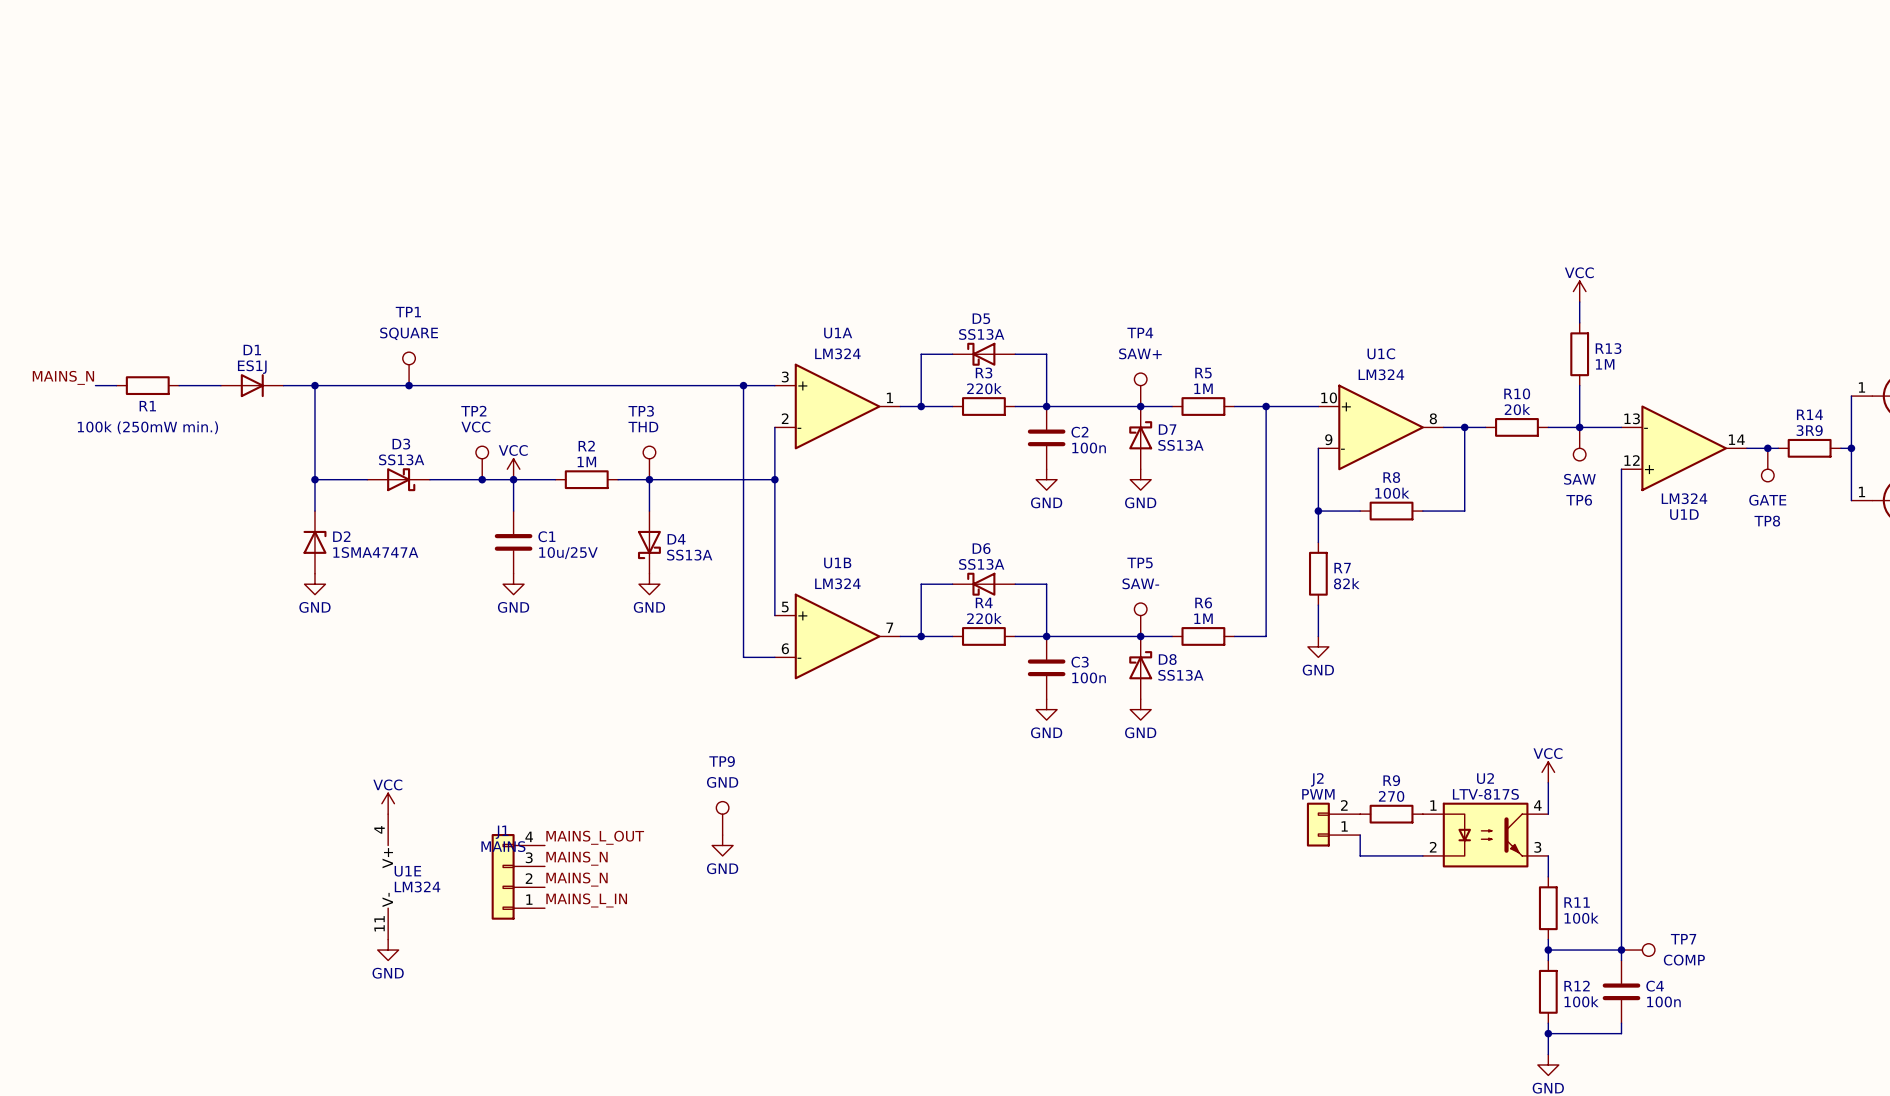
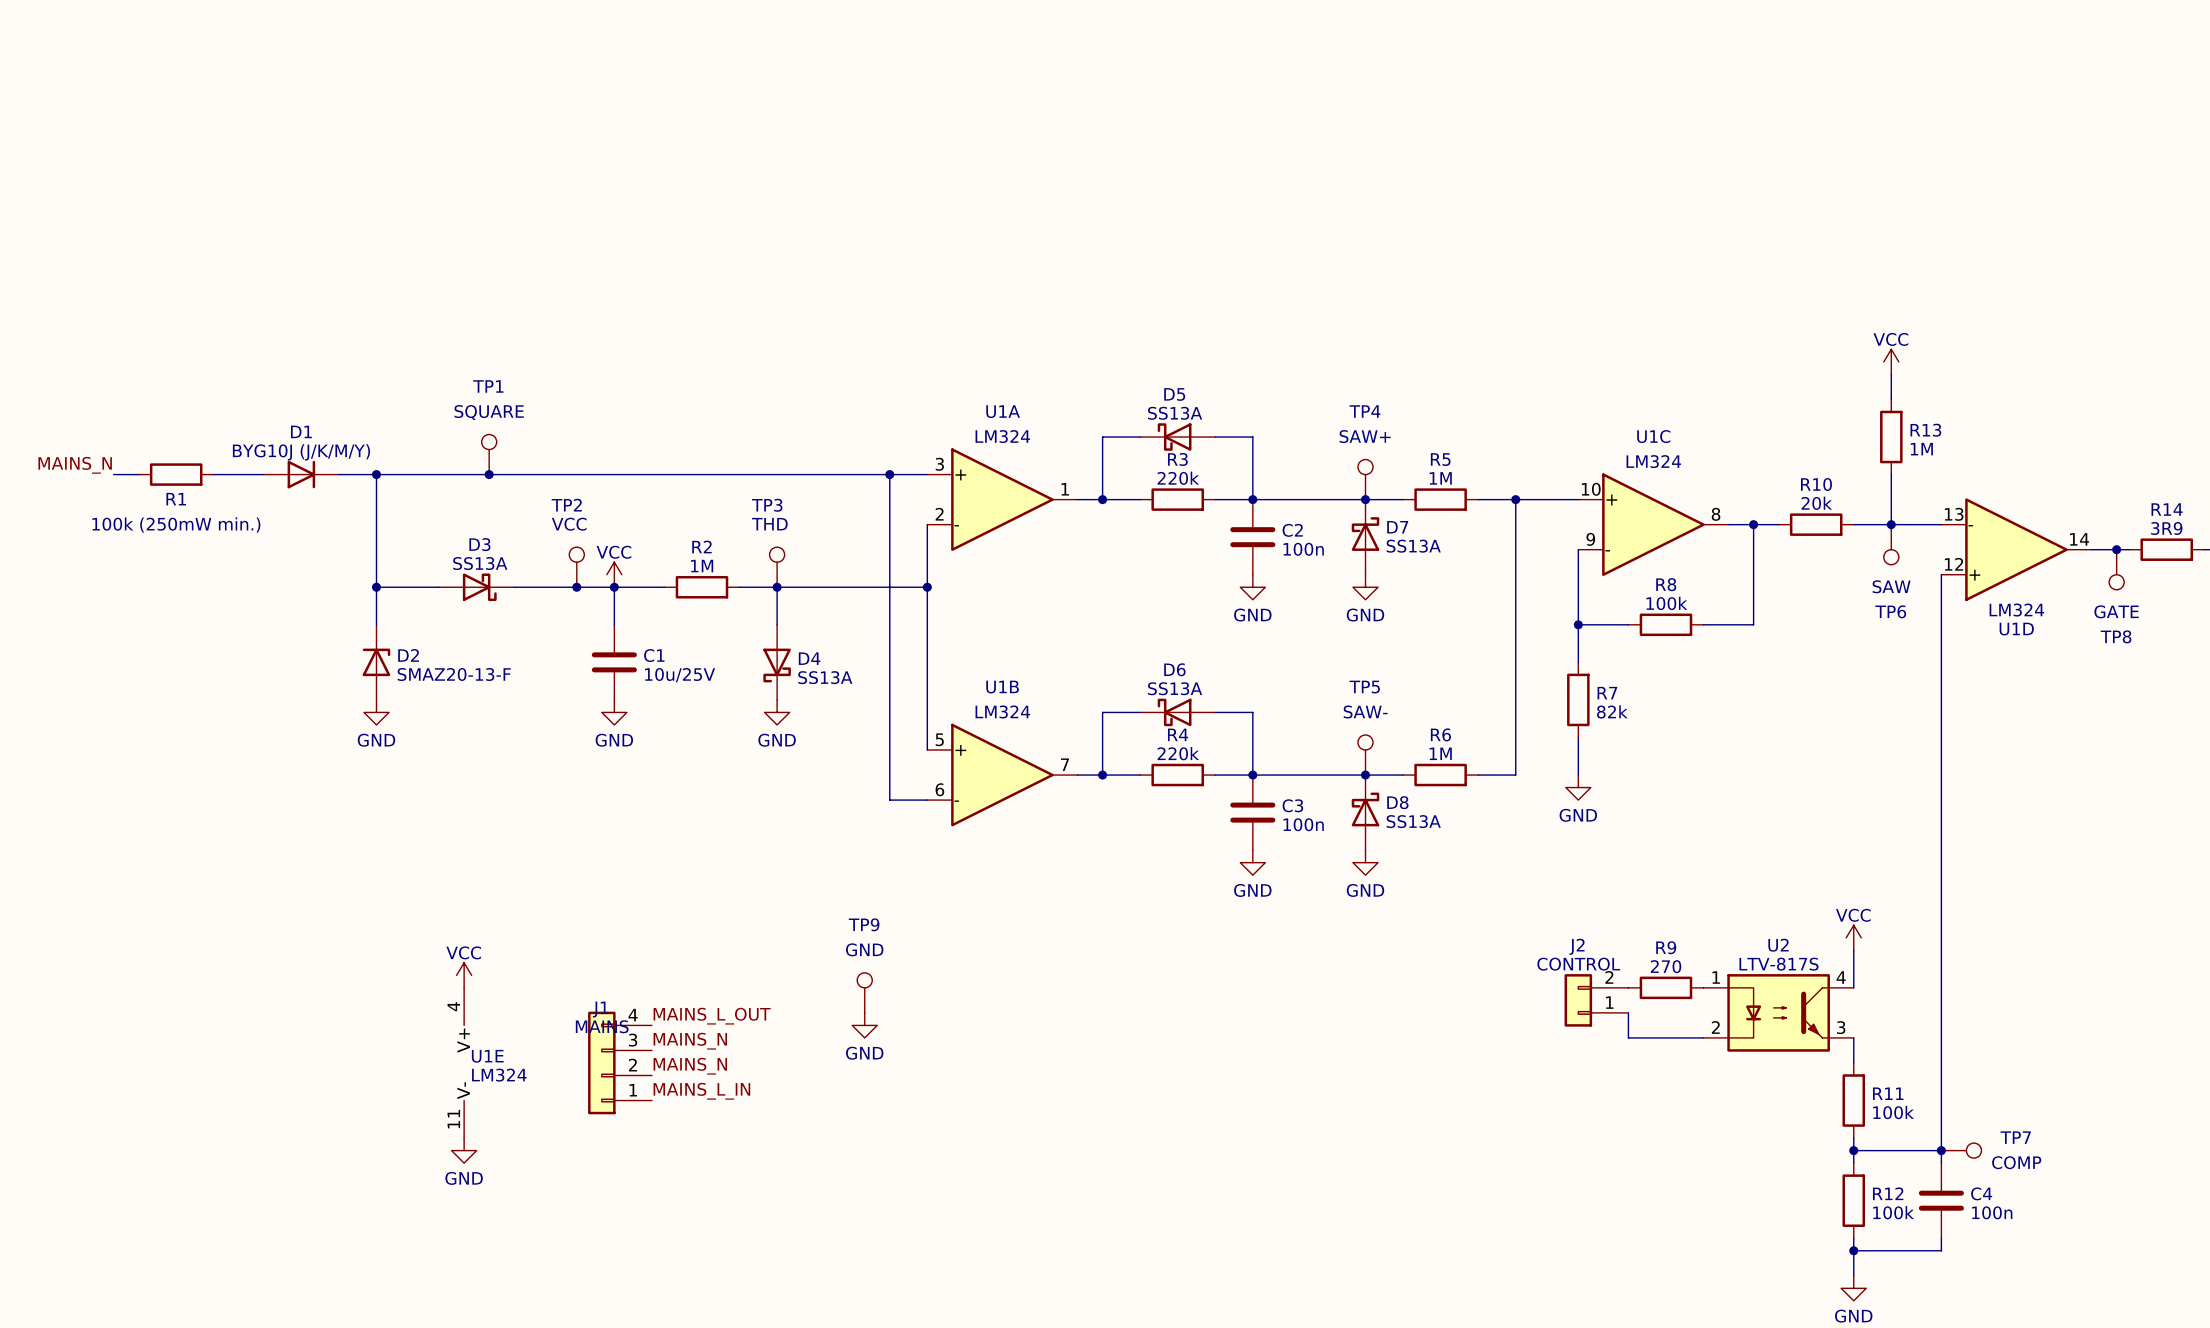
D1 value: ES1J (252, 367) -> BYG10J (J/K/M/Y) (301, 452)
D2 value: 1SMA4747A (375, 552) -> SMAZ20-13-F (454, 674)
J2 value: PWM (1318, 794) -> CONTROL (1578, 964)

